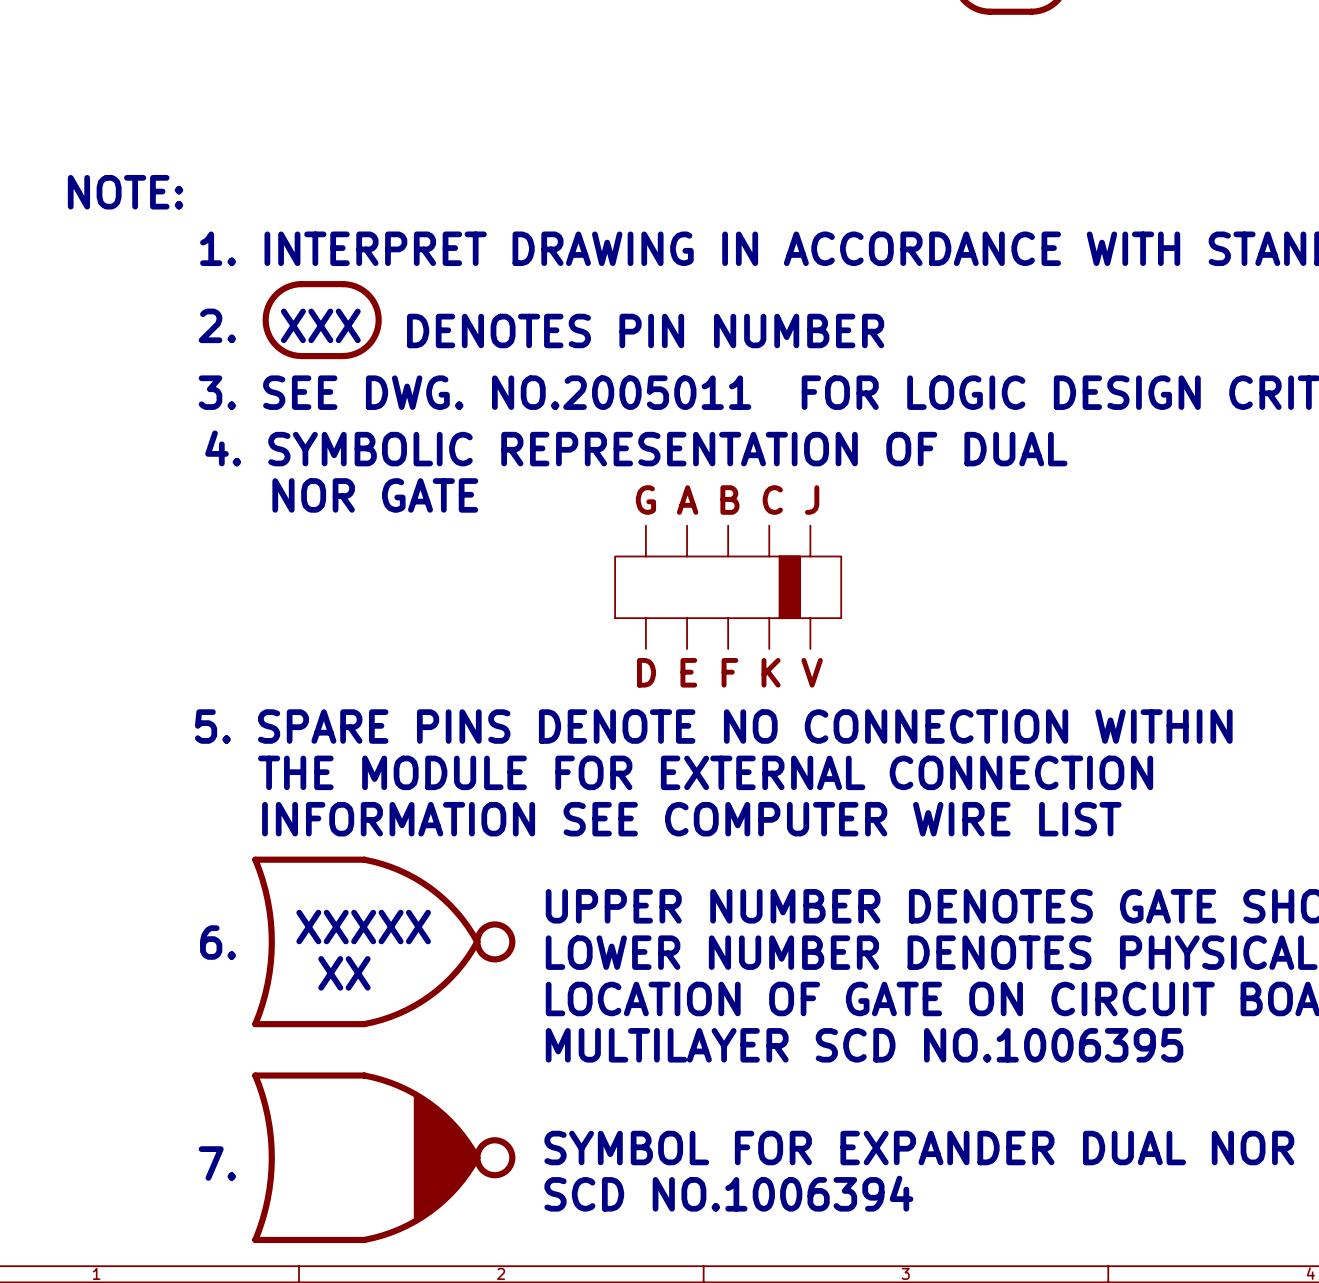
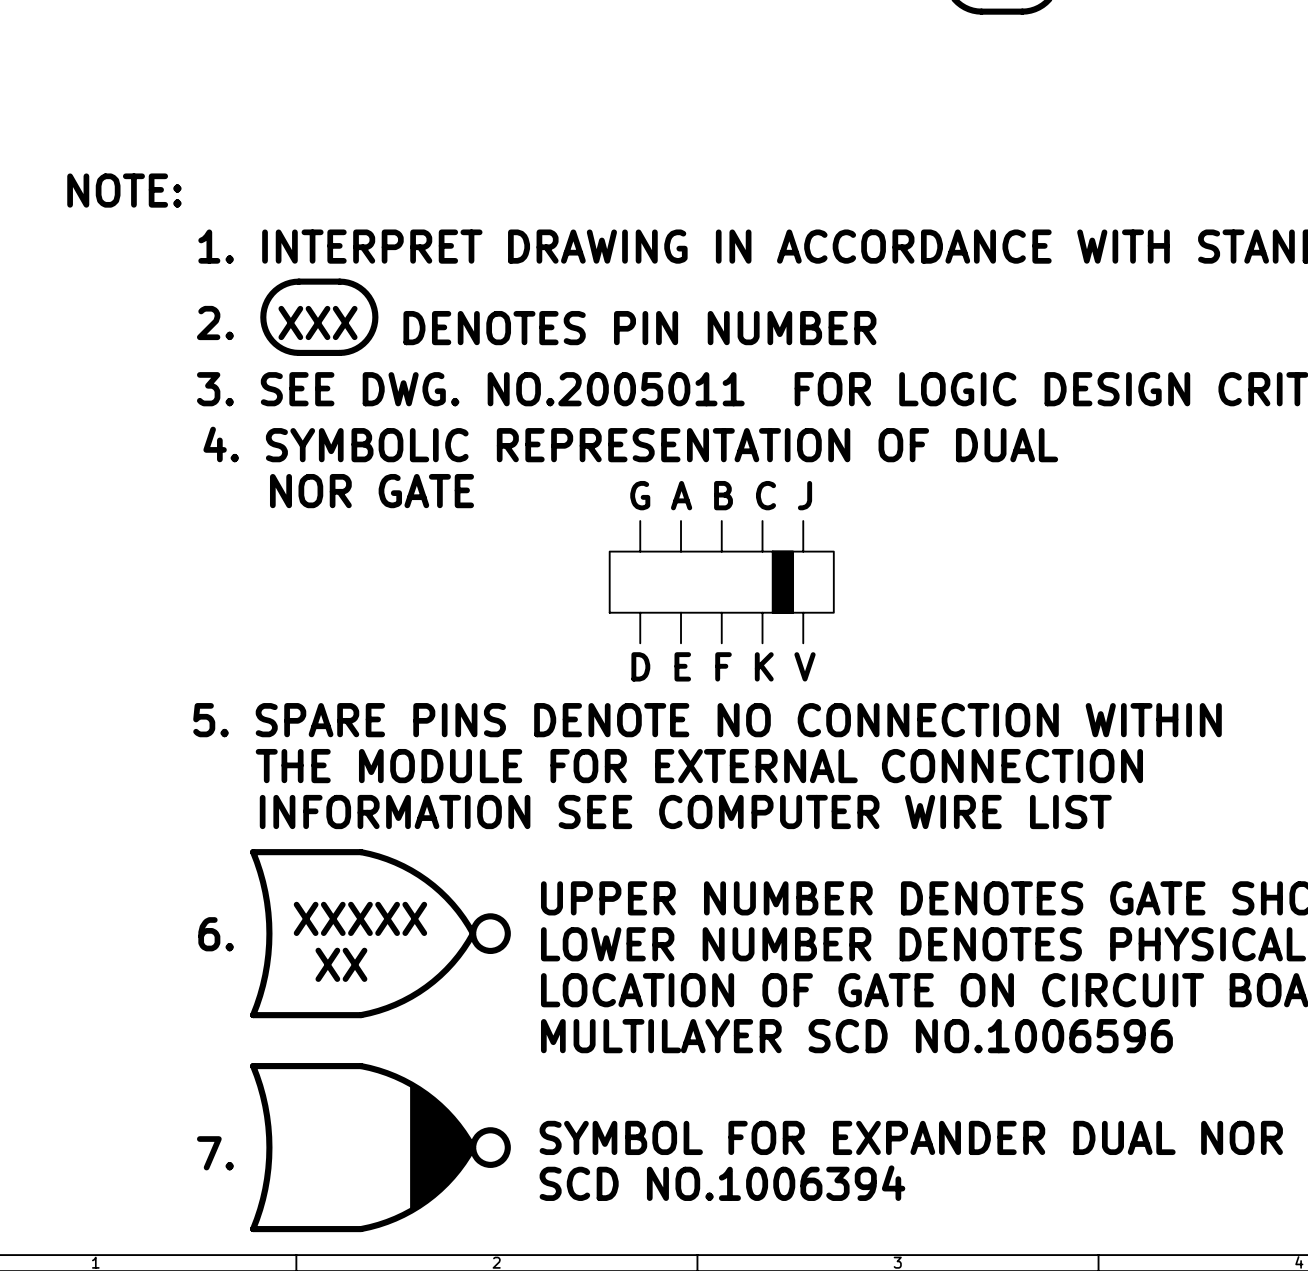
text: MULTILAYER SCD NO.1006395 (864, 1045) -> MULTILAYER SCD NO.1006596 (856, 1036)

